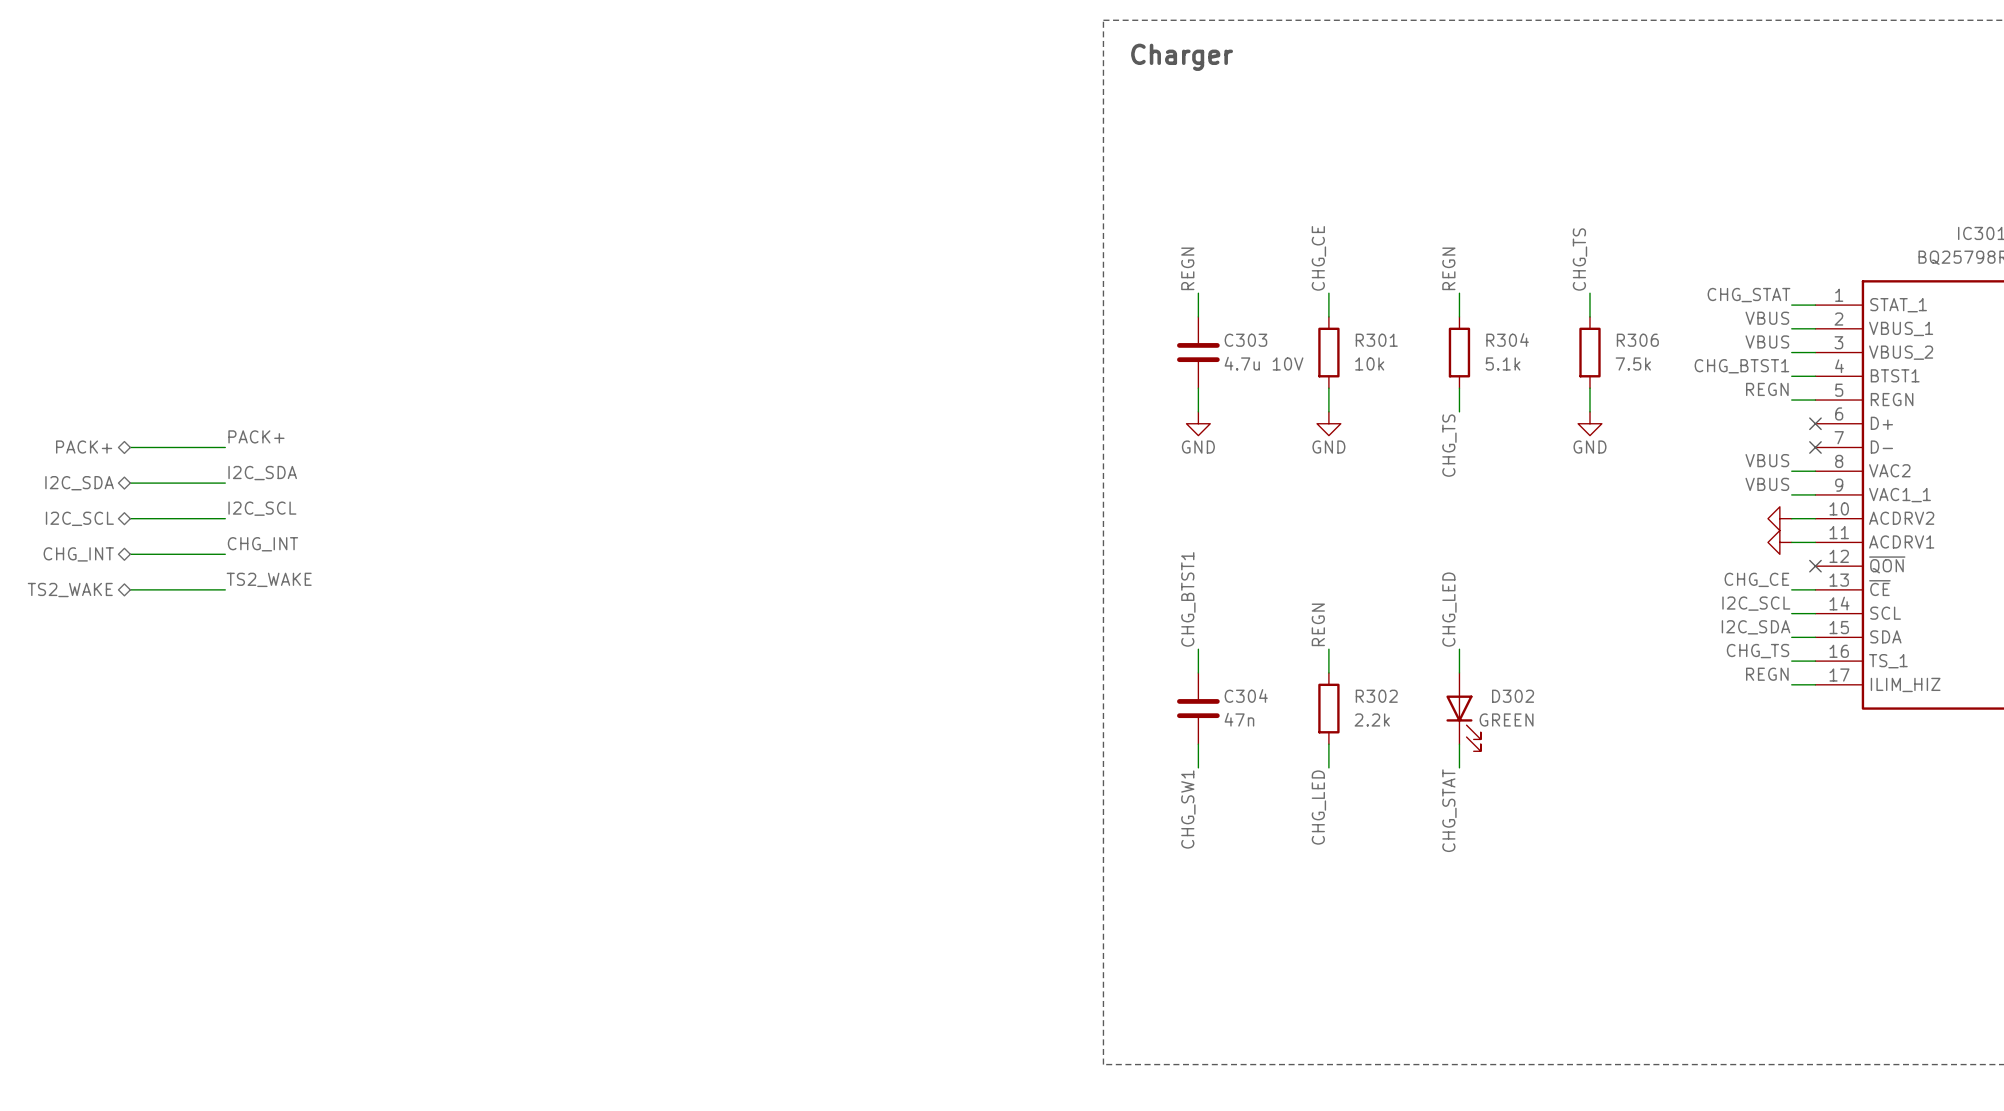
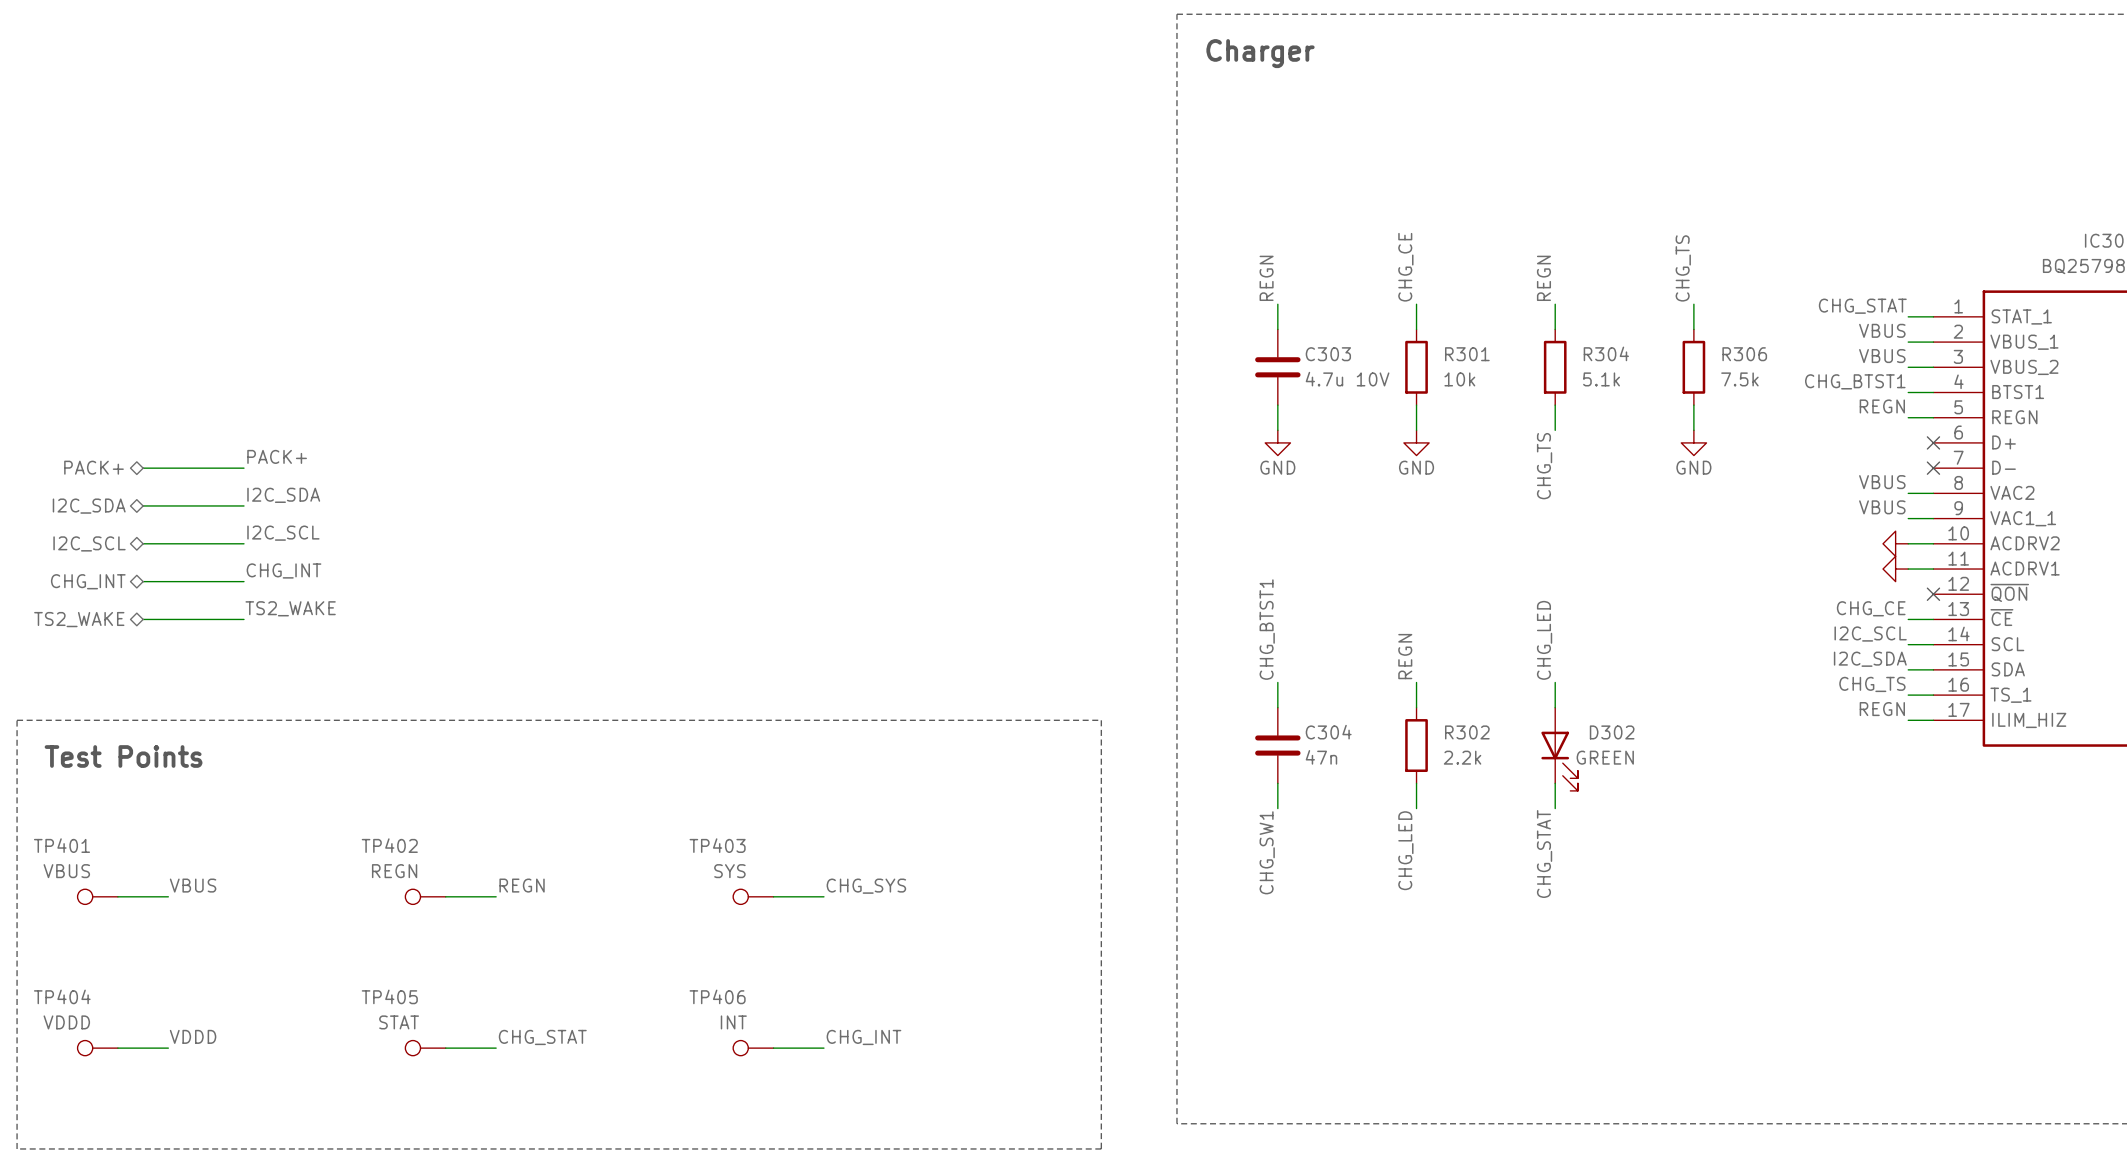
line: none -> (17, 720) (1101, 720) (1101, 1148) (17, 1148) (17, 720)
text: none -> Test Points (123, 756)
label: none -> VBUS (193, 885)
label: none -> REGN (522, 885)
label: none -> CHG_SYS (866, 886)
TP401: none -> VBUS (97, 896)
wire: none -> (117, 896) (168, 896)
TP402: none -> REGN (425, 896)
wire: none -> (445, 896) (496, 896)
TP403: none -> SYS (753, 896)
wire: none -> (773, 896) (823, 896)
label: none -> VDDD (193, 1036)
label: none -> CHG_STAT (542, 1037)
label: none -> CHG_INT (863, 1037)
TP404: none -> VDDD (97, 1048)
wire: none -> (117, 1048) (168, 1048)
TP405: none -> STAT (425, 1048)
wire: none -> (445, 1048) (496, 1048)
TP406: none -> INT (753, 1048)
wire: none -> (773, 1048) (823, 1048)

